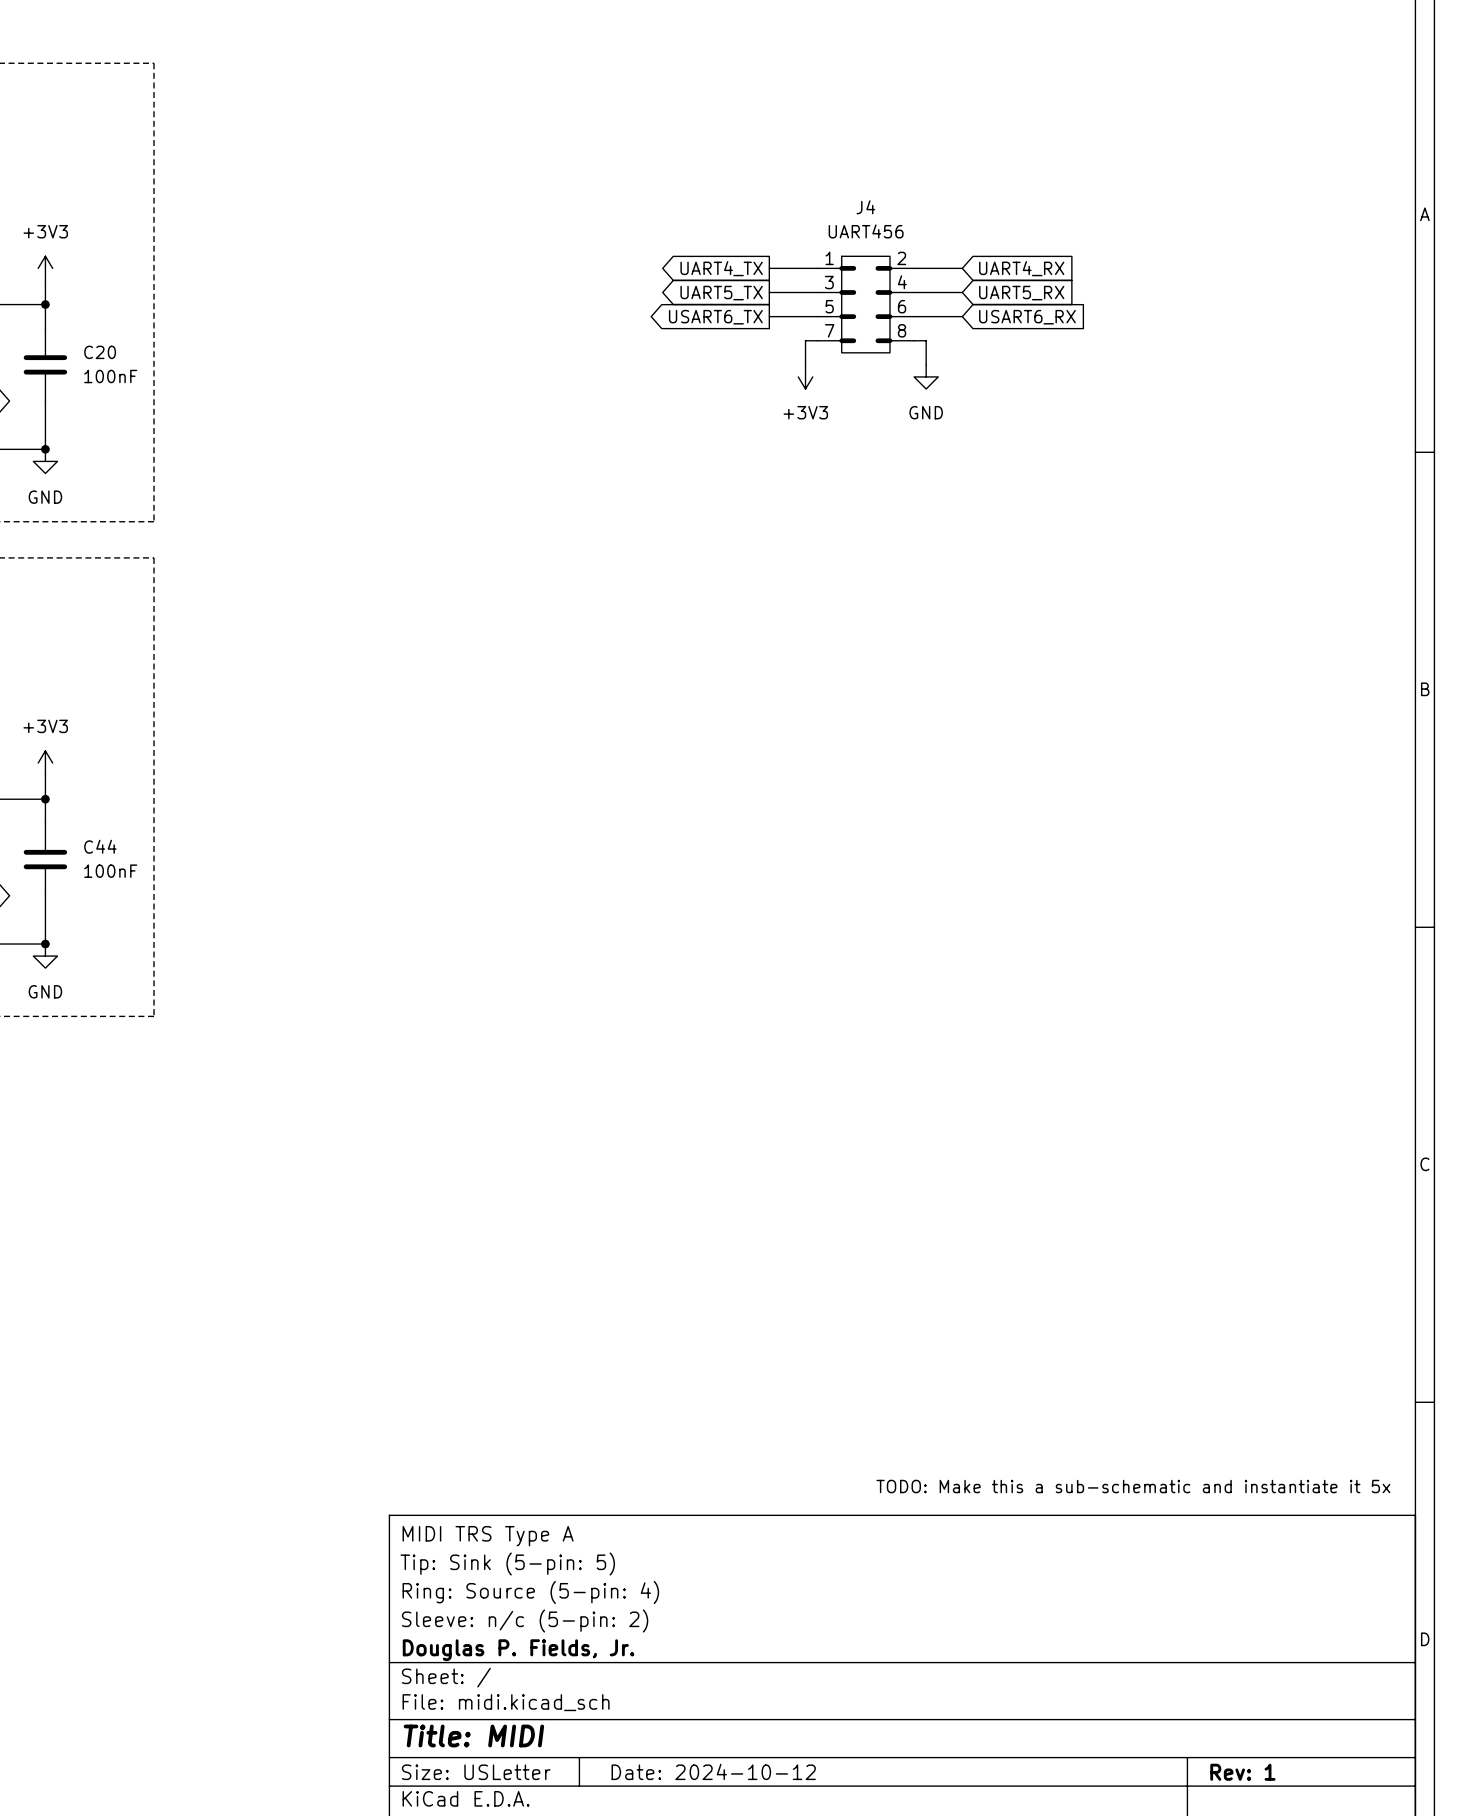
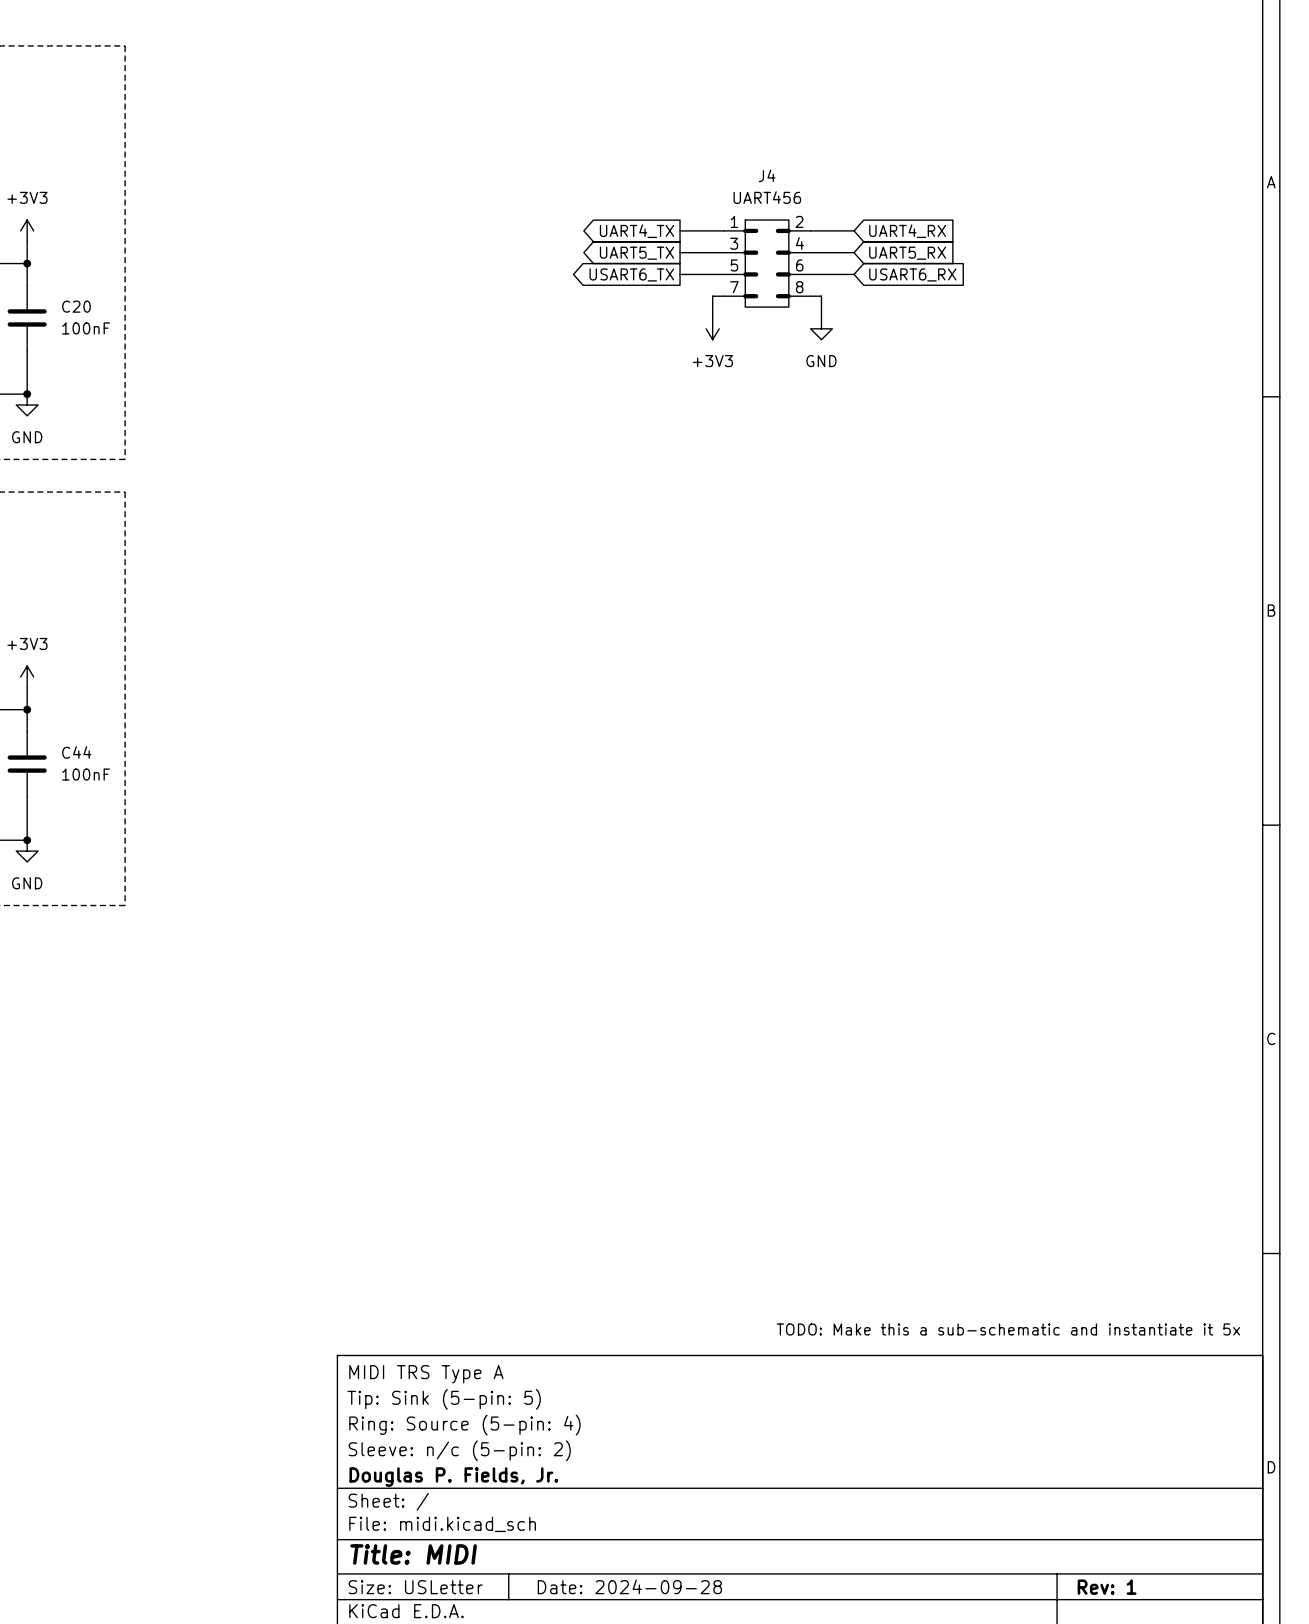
title block: Date: 2024-10-12 (713, 1771) -> Date: 2024-09-28 (629, 1586)

